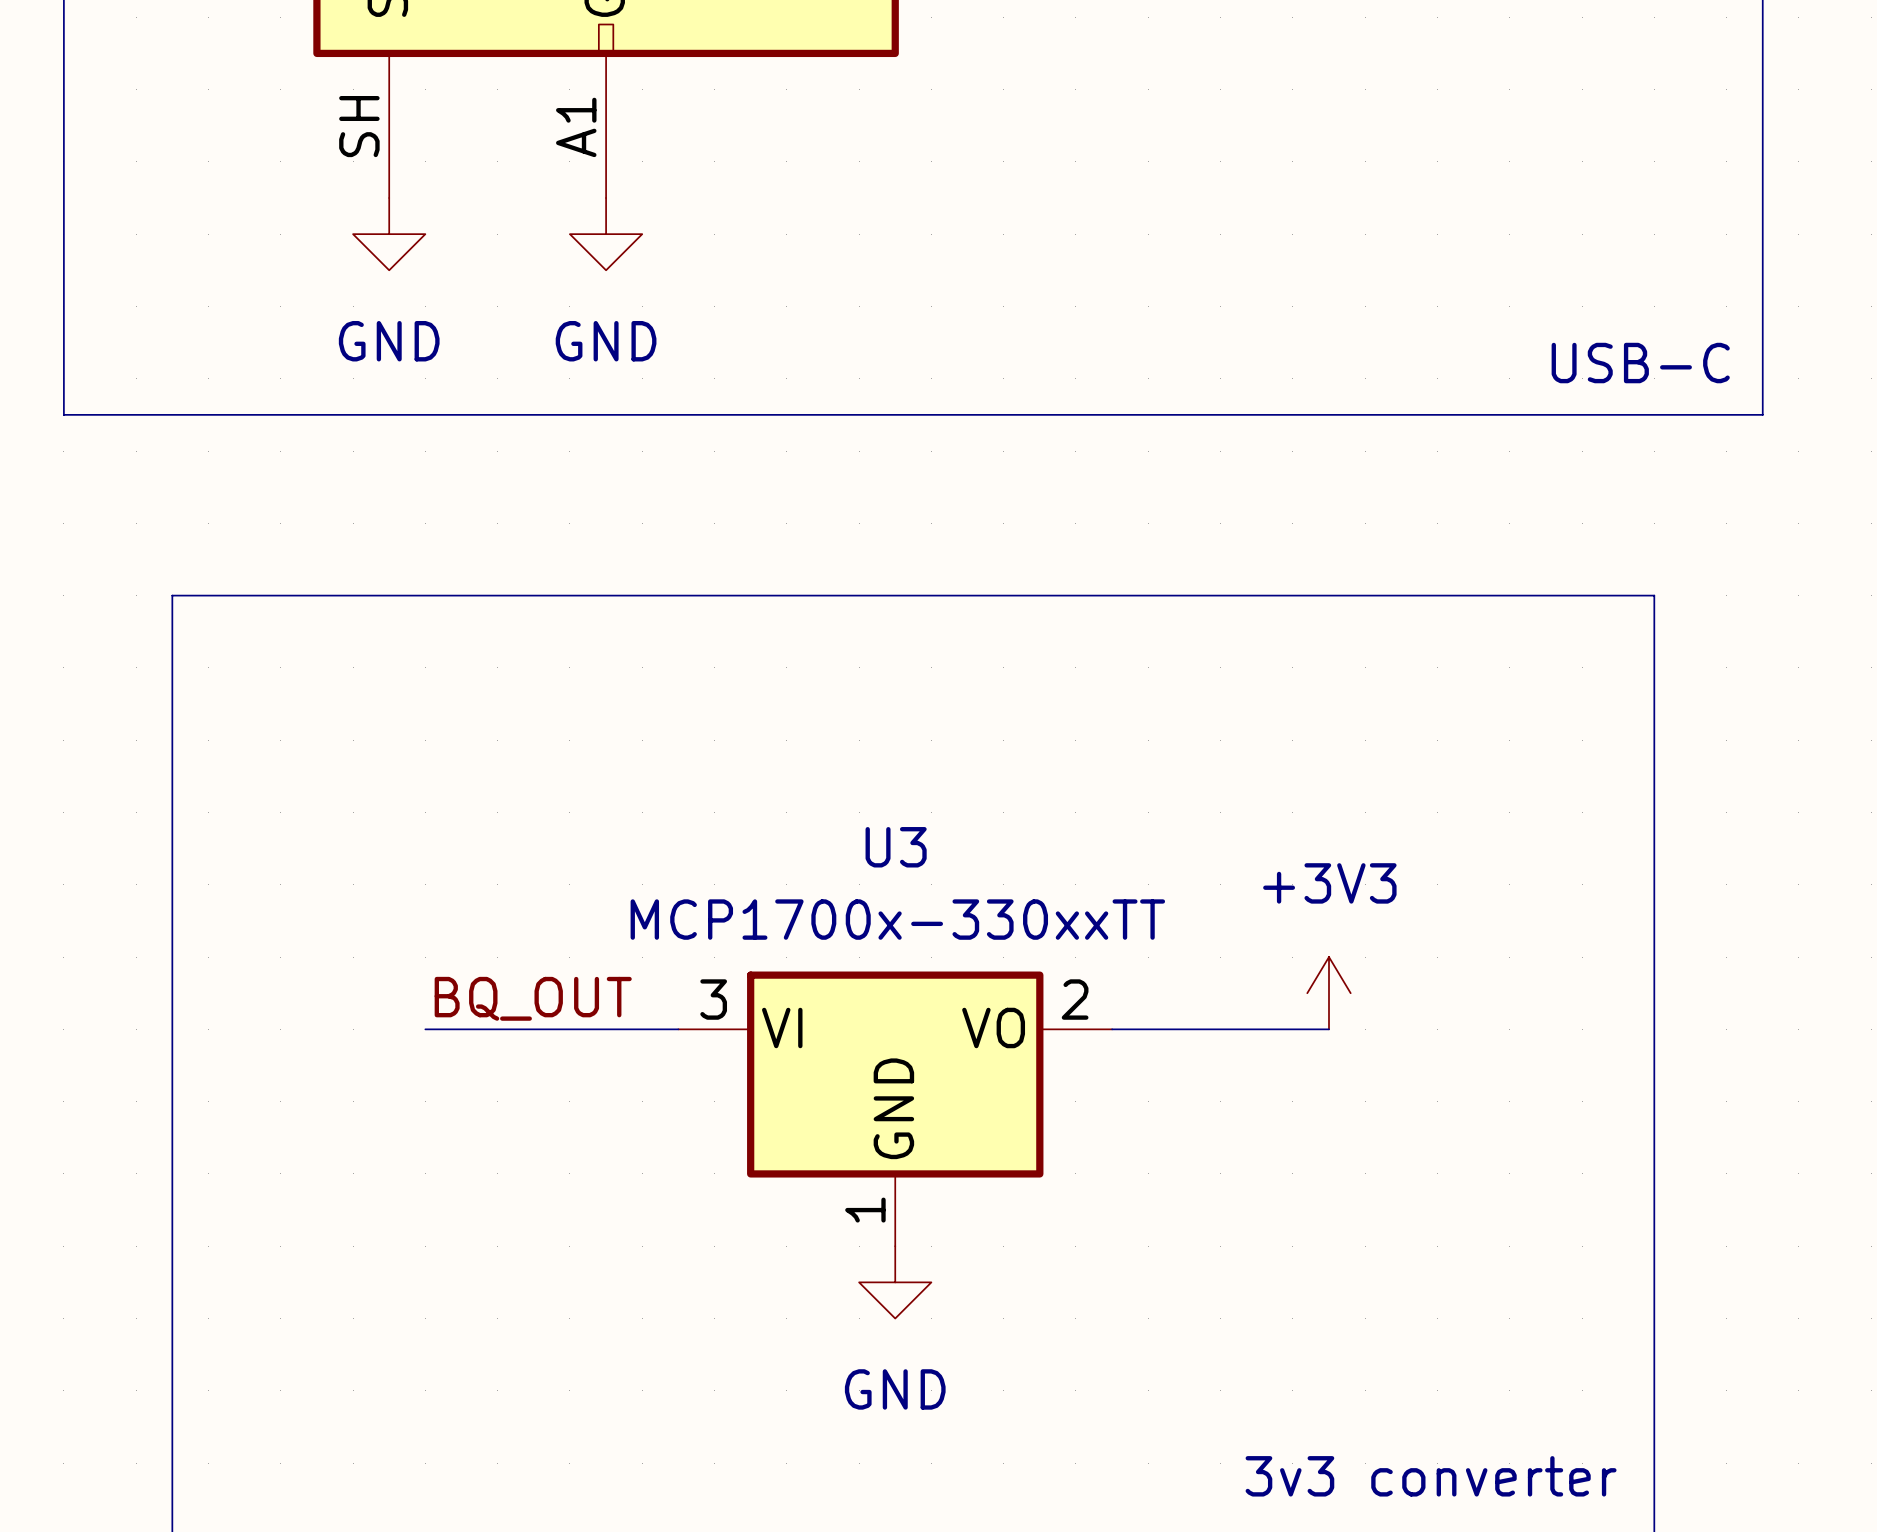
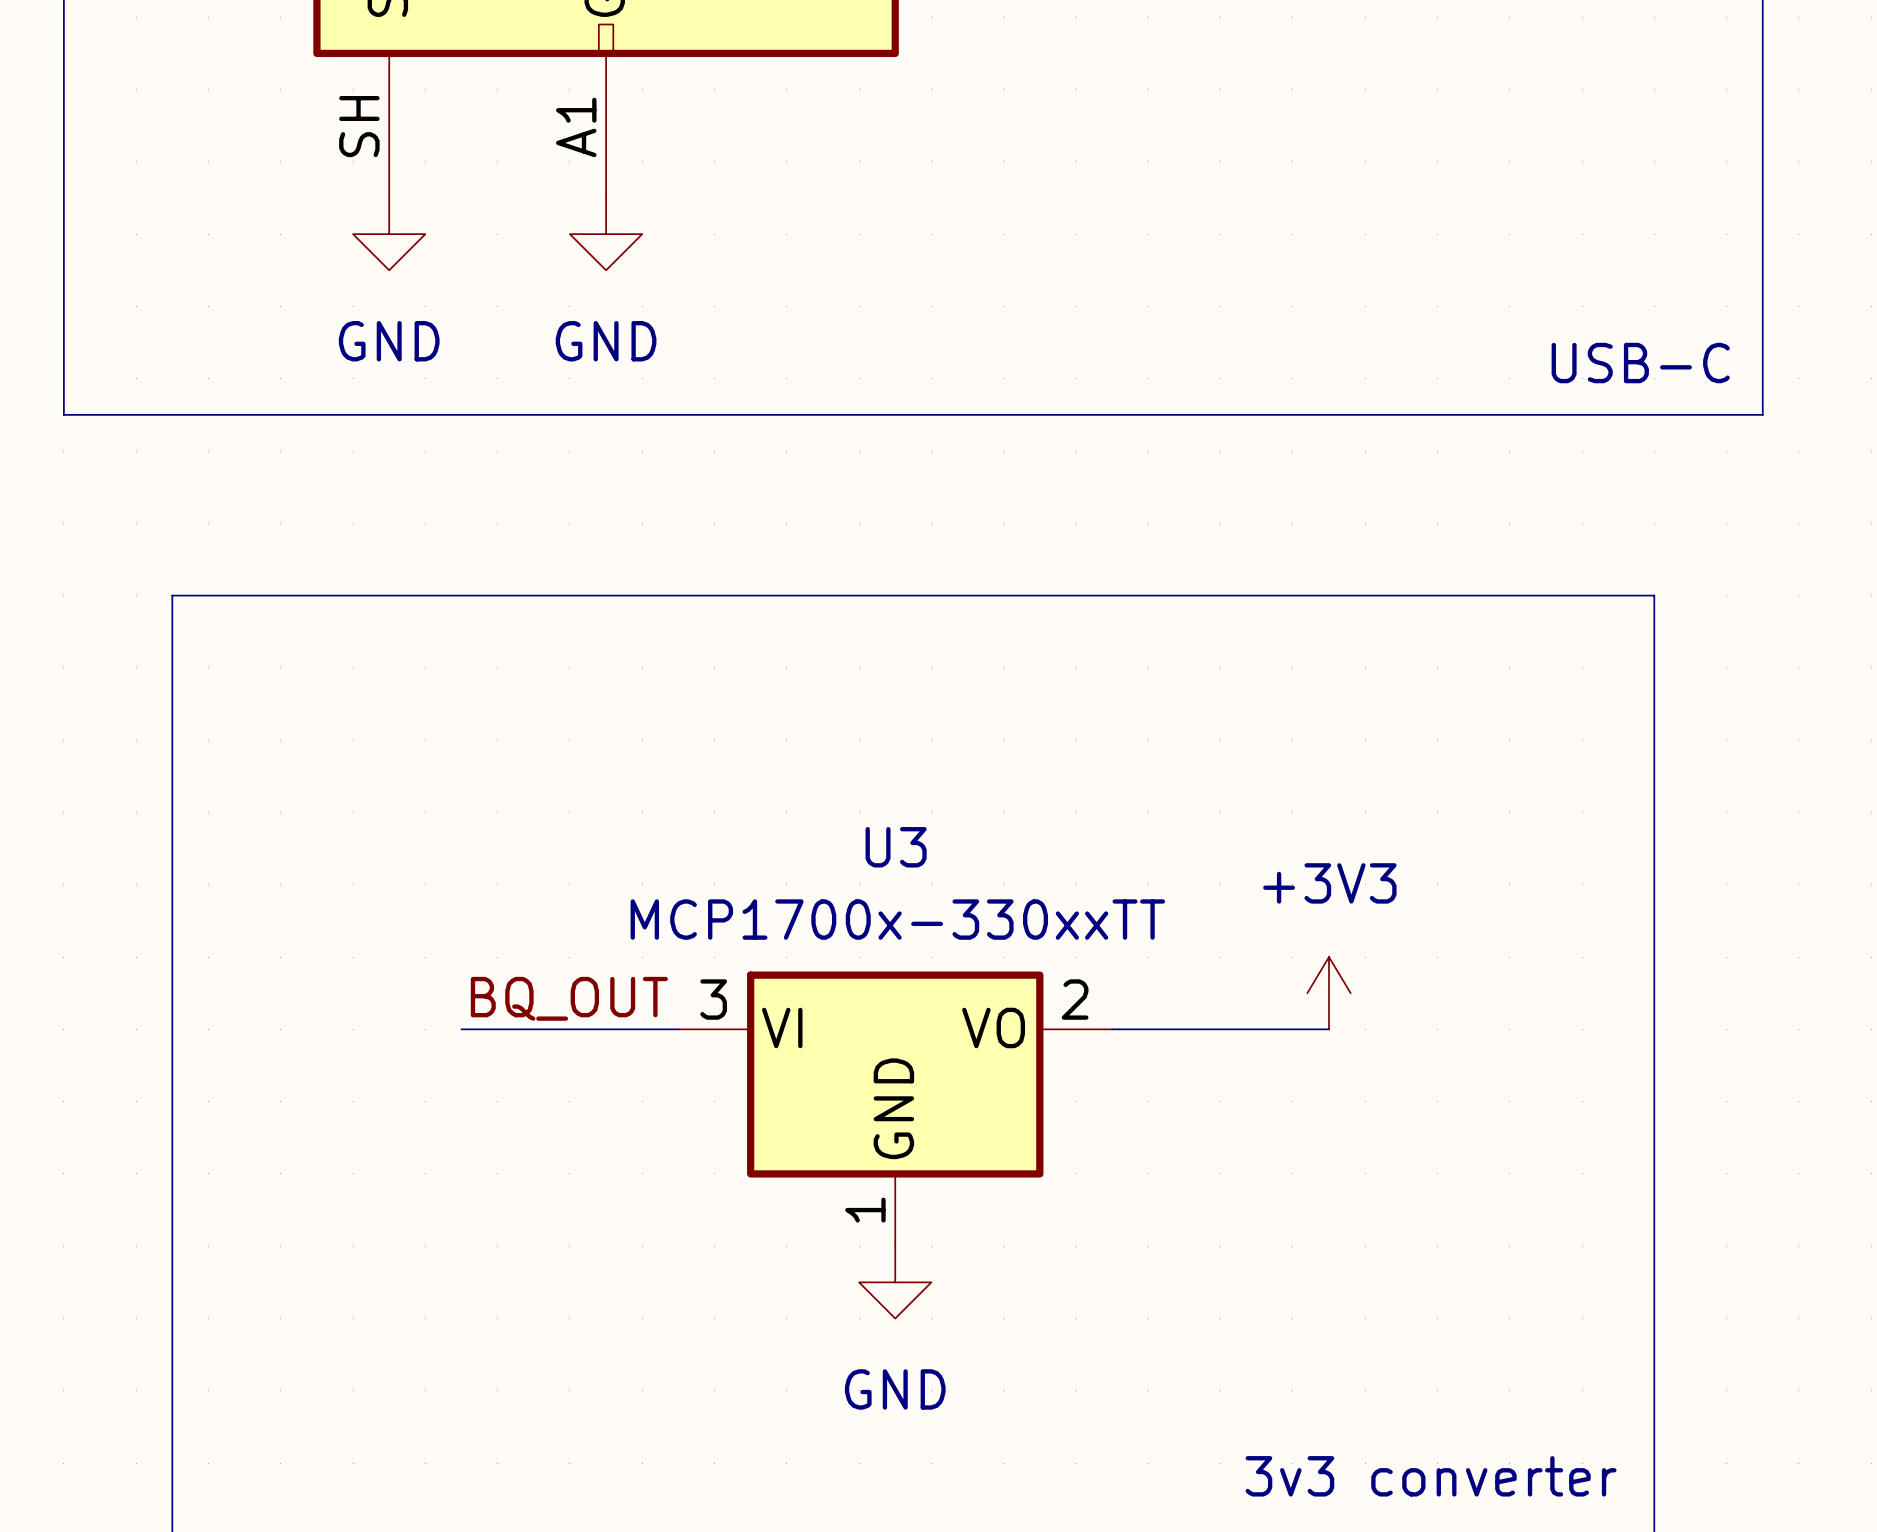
label position: BQ_OUT (533, 998) -> BQ_OUT (569, 998)
wire: (425, 1029) (461, 1029) -> none

